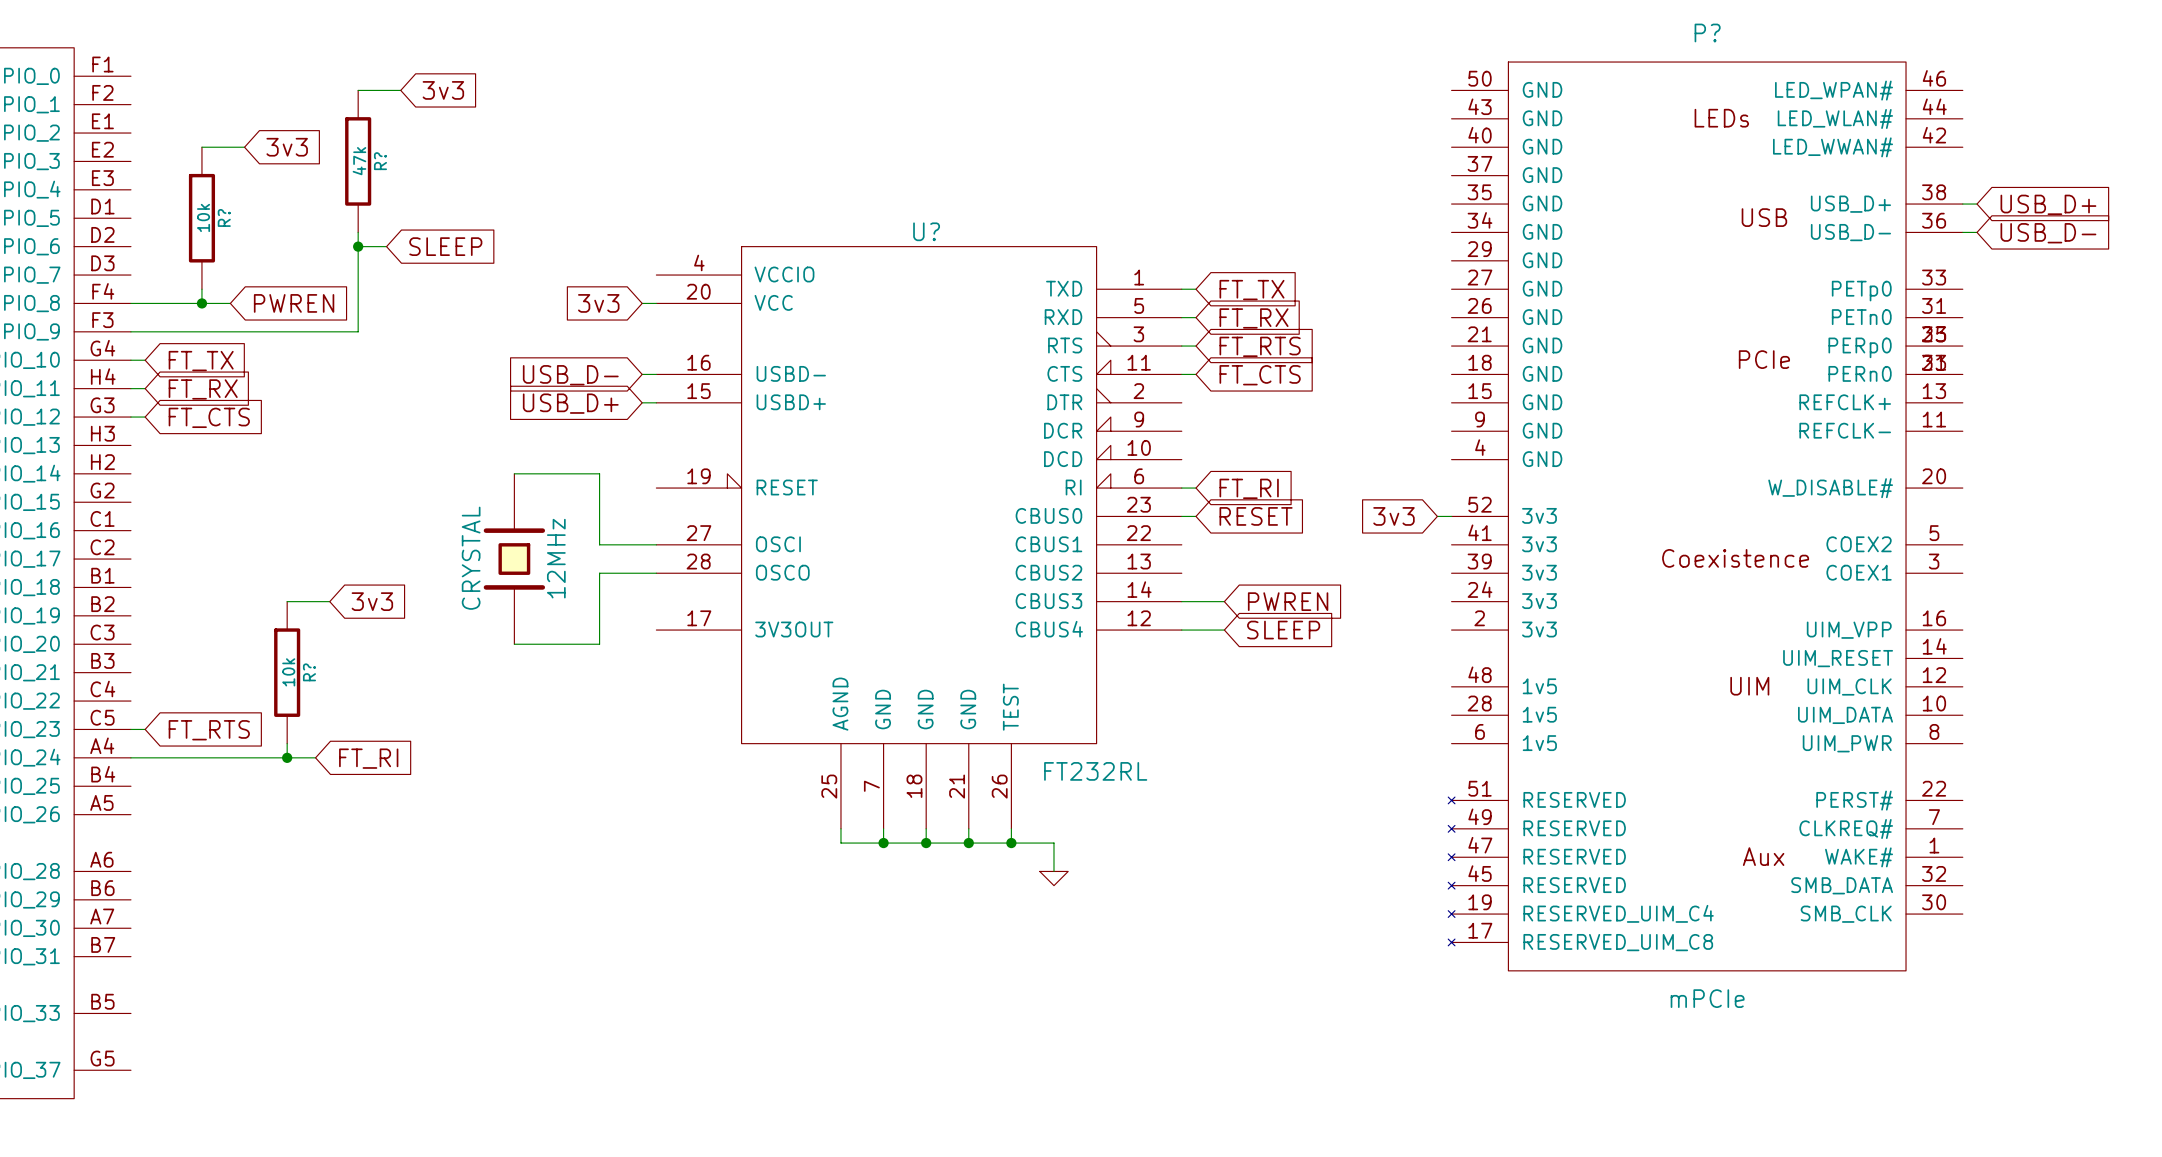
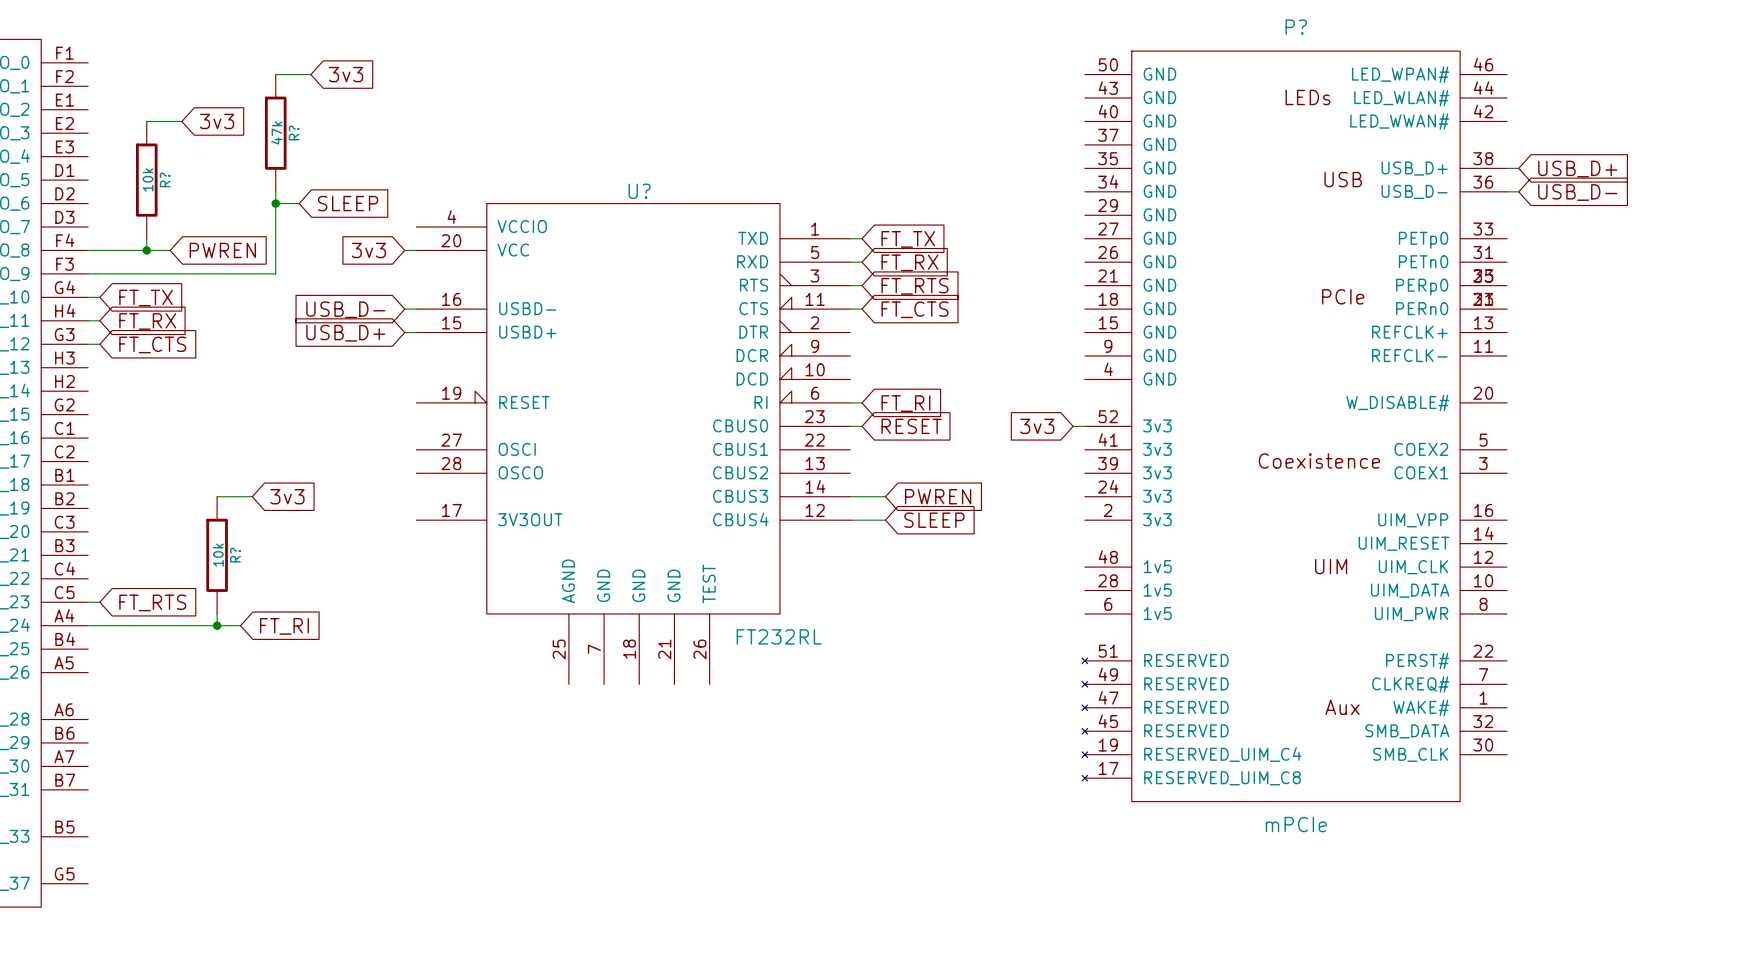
wire: (1962, 204) (1977, 204) -> (1507, 168) (1518, 168)
global label position: USB_D+ (2048, 204) -> USB_D+ (1577, 169)
wire: (1962, 232) (1977, 232) -> (1507, 191) (1518, 191)
global label position: USB_D- (2048, 233) -> USB_D- (1577, 192)
wire: (1181, 289) (1195, 289) -> (850, 238) (862, 238)
global label position: FT_TX (1251, 290) -> FT_TX (908, 239)
global label position: 3v3 (598, 303) -> 3v3 (368, 250)
wire: (642, 303) (656, 303) -> (404, 250) (416, 250)
wire: (1181, 317) (1195, 317) -> (850, 262) (862, 262)
global label position: FT_RX (1254, 318) -> FT_RX (909, 262)
wire: (1181, 346) (1195, 346) -> (850, 285) (862, 285)
global label position: FT_RTS (1260, 346) -> FT_RTS (915, 286)
wire: (642, 374) (656, 374) -> (404, 309) (416, 309)
wire: (1181, 374) (1195, 374) -> (850, 309) (862, 309)
global label position: USB_D- (570, 375) -> USB_D- (345, 309)
global label position: FT_CTS (1260, 375) -> FT_CTS (915, 309)
wire: (642, 402) (656, 402) -> (404, 332) (416, 332)
global label position: USB_D+ (570, 403) -> USB_D+ (345, 333)
wire: (514, 473) (599, 473) (599, 544) (656, 544) -> none
wire: (1181, 488) (1195, 488) -> (850, 402) (862, 402)
global label position: FT_RI (1249, 488) -> FT_RI (905, 403)
wire: (1181, 516) (1195, 516) -> (850, 426) (862, 426)
global label position: RESET (1256, 516) -> RESET (911, 426)
global label position: 3v3 (1393, 516) -> 3v3 (1037, 426)
wire: (1437, 516) (1451, 516) -> (1073, 426) (1084, 426)
P? position: (1705, 516) -> (1294, 426)
U? position: (919, 537) -> (633, 443)
12MHz: CRYSTAL (514, 559) -> none
wire: (656, 573) (599, 573) (599, 644) (514, 644) -> none
wire: (1181, 601) (1224, 601) -> (850, 496) (885, 496)
global label position: PWREN (1288, 601) -> PWREN (938, 496)
wire: (1181, 630) (1224, 630) -> (850, 520) (885, 520)
global label position: SLEEP (1283, 630) -> SLEEP (934, 520)
wire: (840, 828) (840, 843) (1053, 843) (1053, 871) -> none
wire: (883, 828) (883, 843) -> none
wire: (926, 828) (926, 843) -> none
wire: (968, 828) (968, 843) -> none
wire: (1011, 828) (1011, 843) -> none
junction: (883, 843) -> none
junction: (926, 843) -> none
junction: (968, 843) -> none
junction: (1011, 843) -> none
power symbol: (1053, 878) -> none

